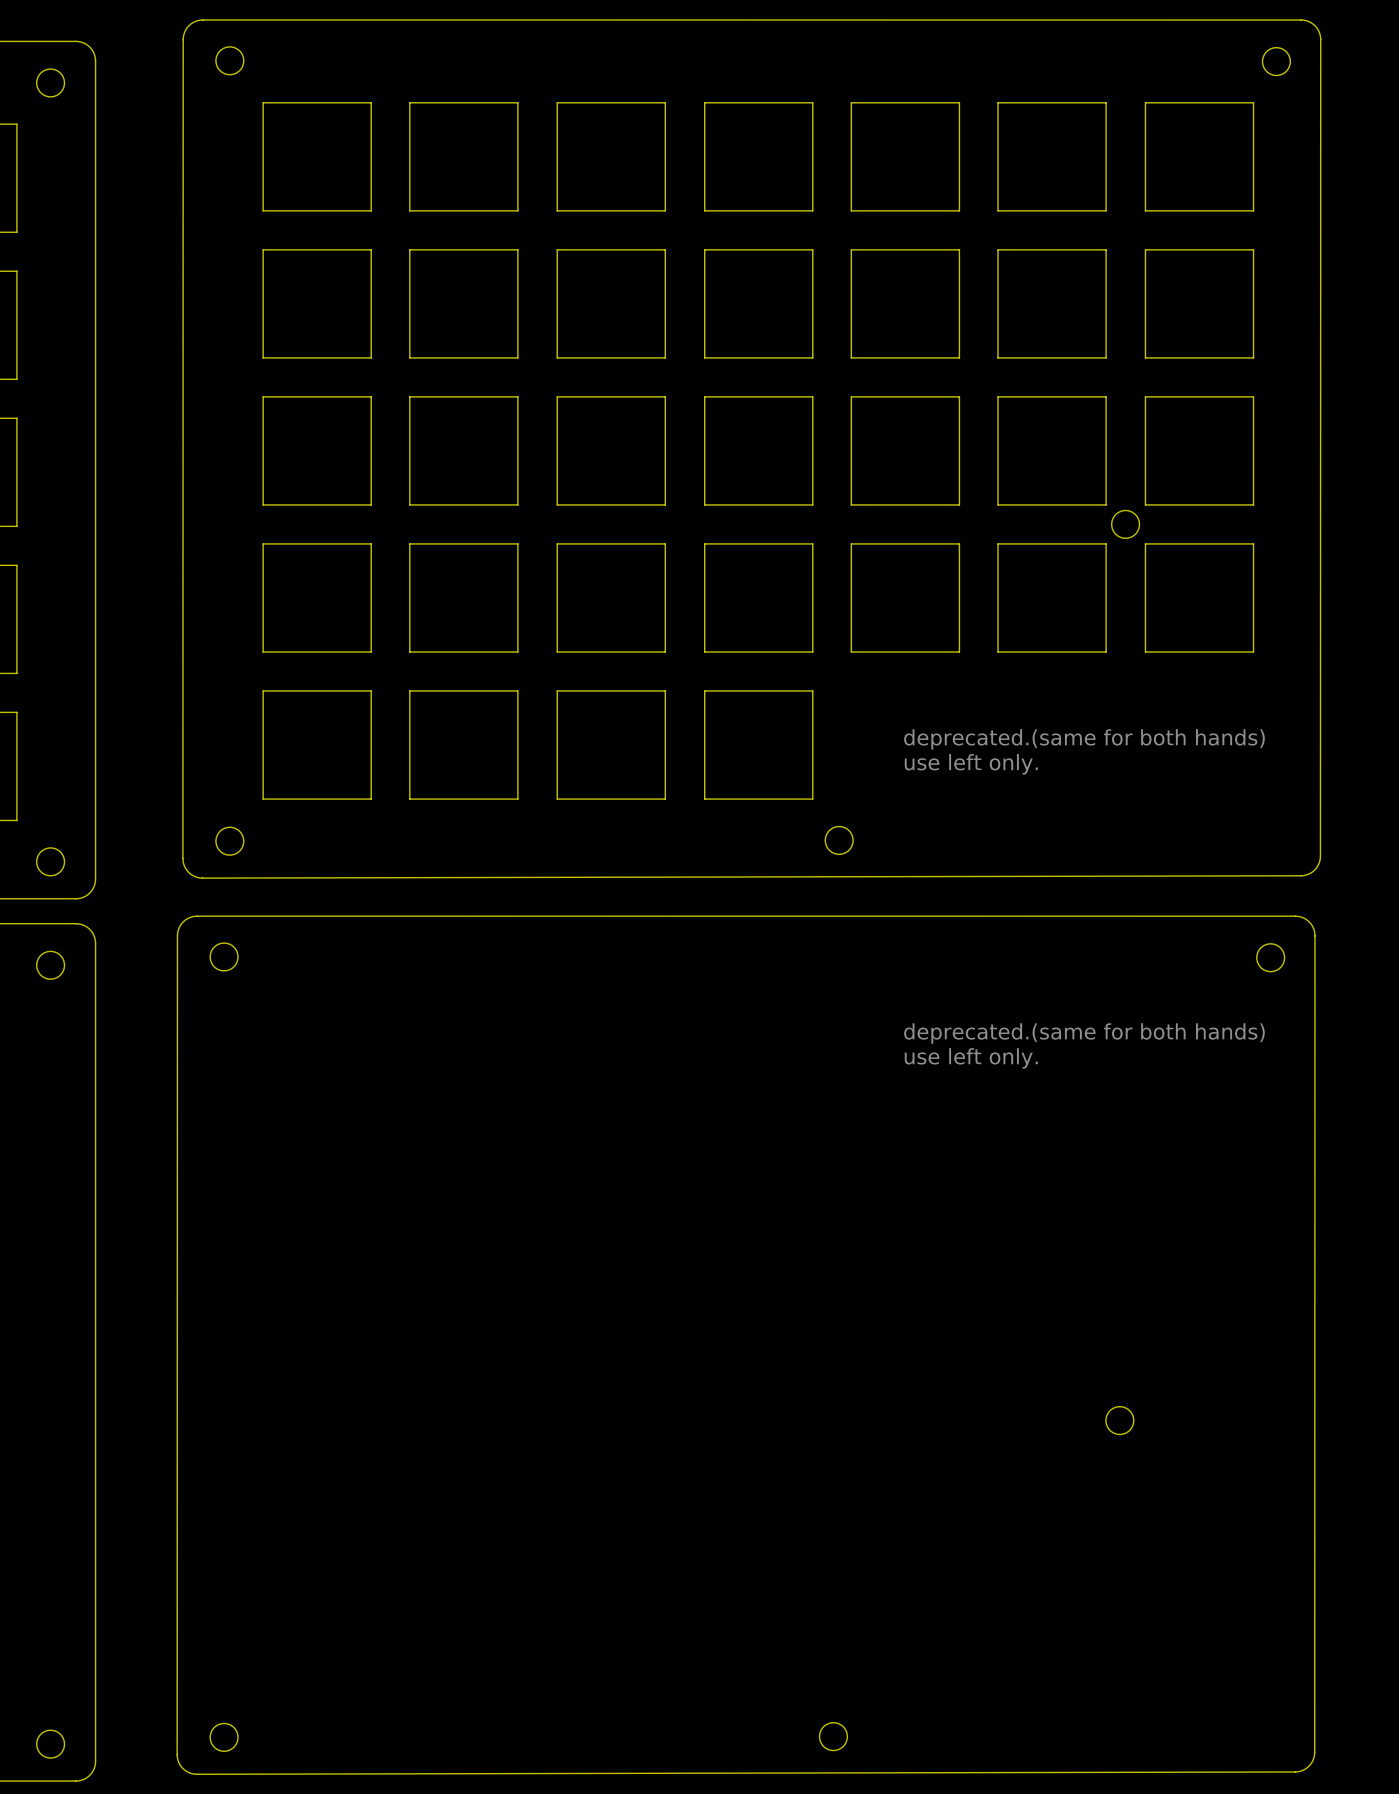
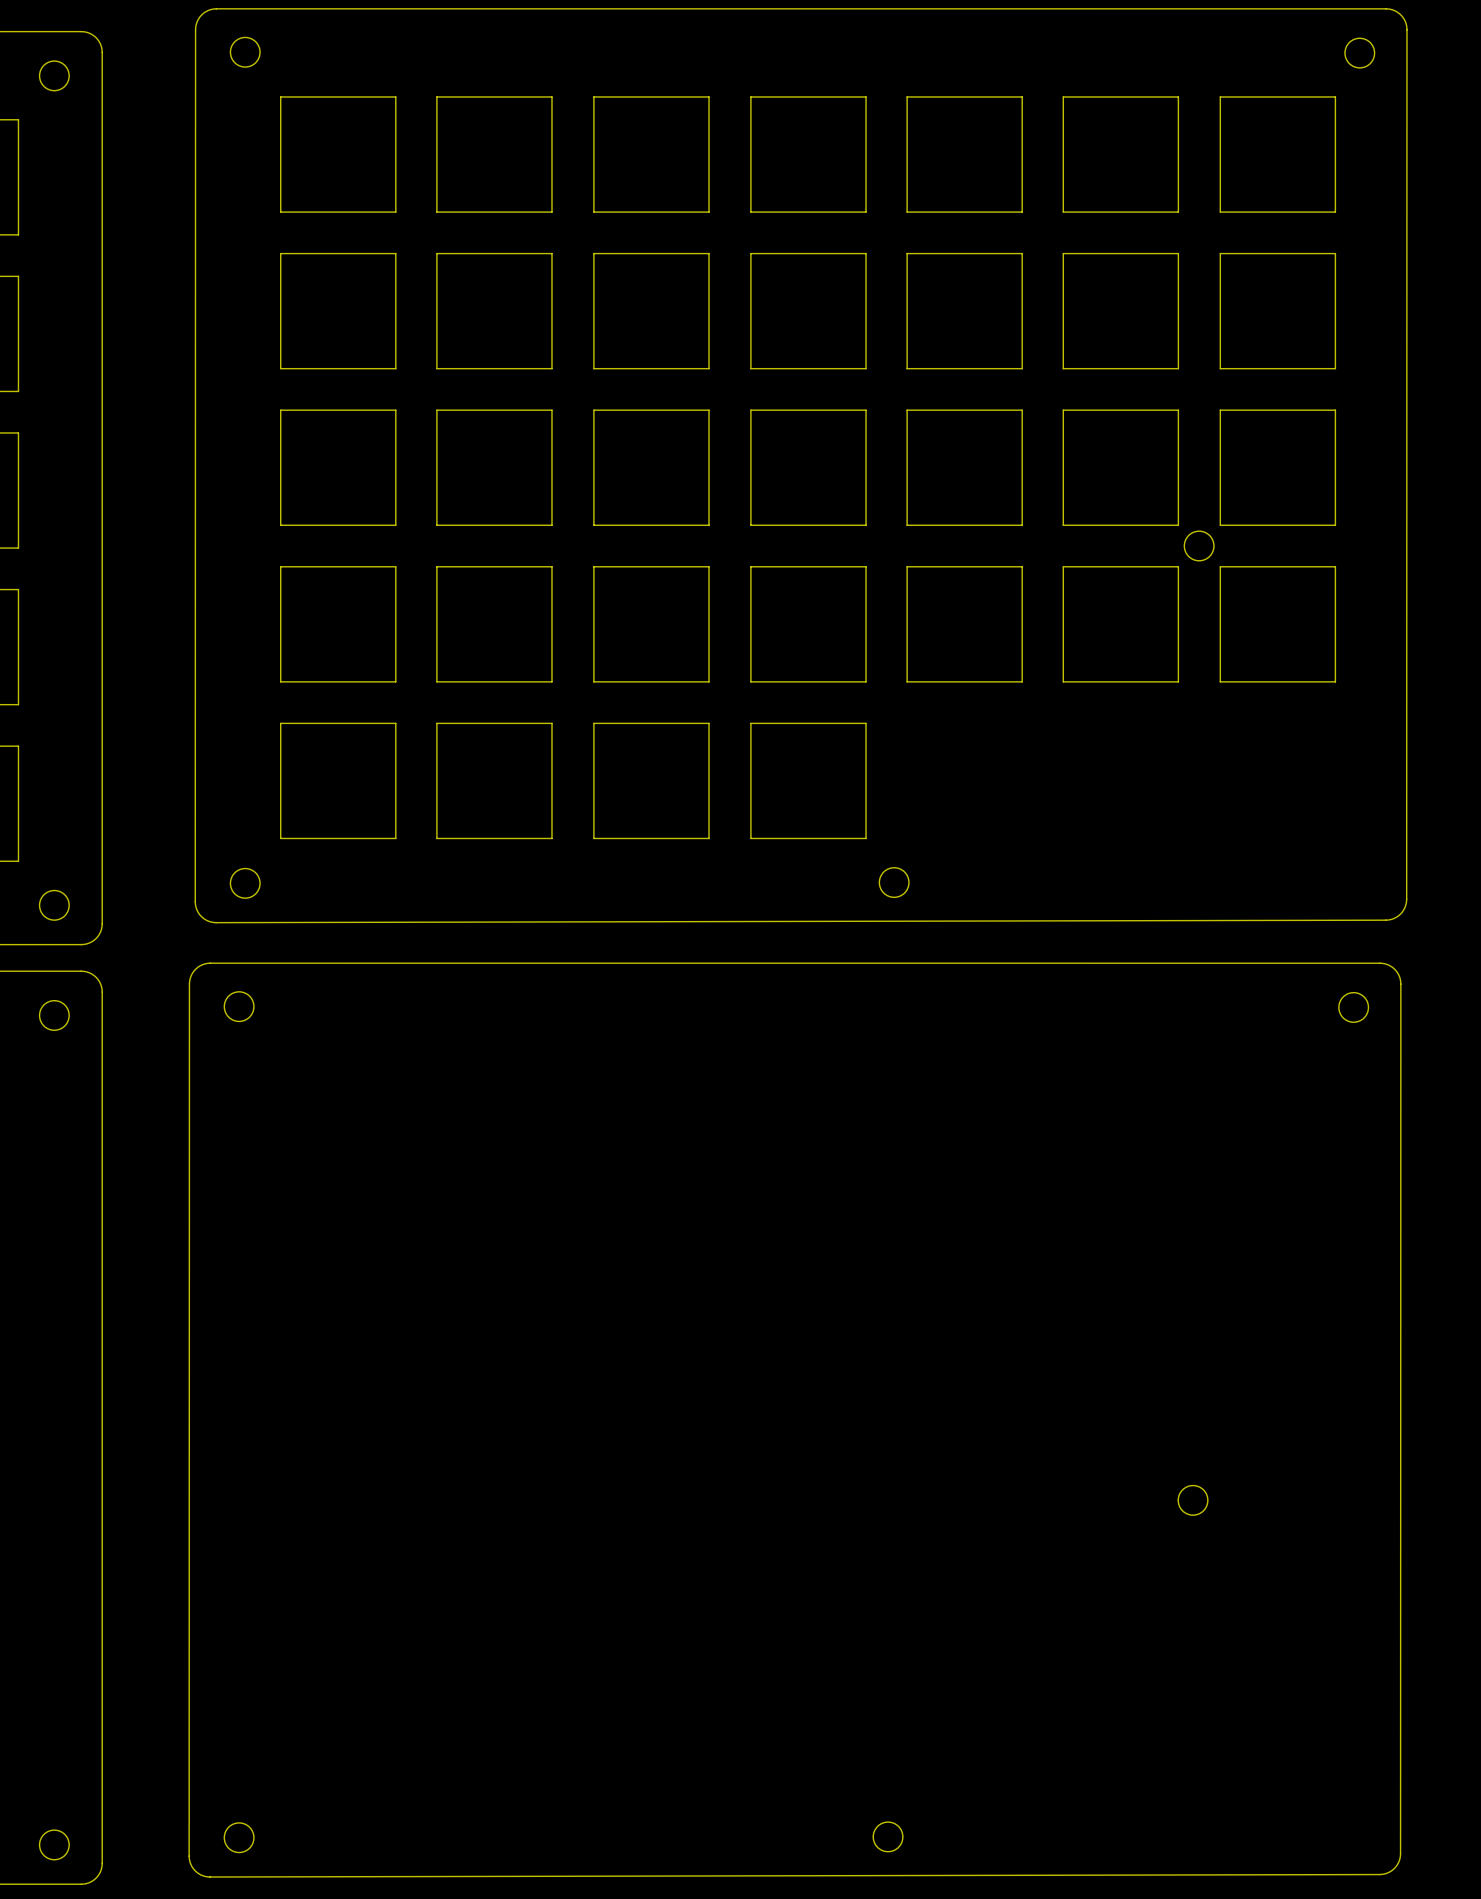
text: deprecated.(same for both hands) (1084, 739) -> none
text: use left only. (971, 764) -> none
text: deprecated.(same for both hands) (1084, 1033) -> none
text: use left only. (971, 1058) -> none

